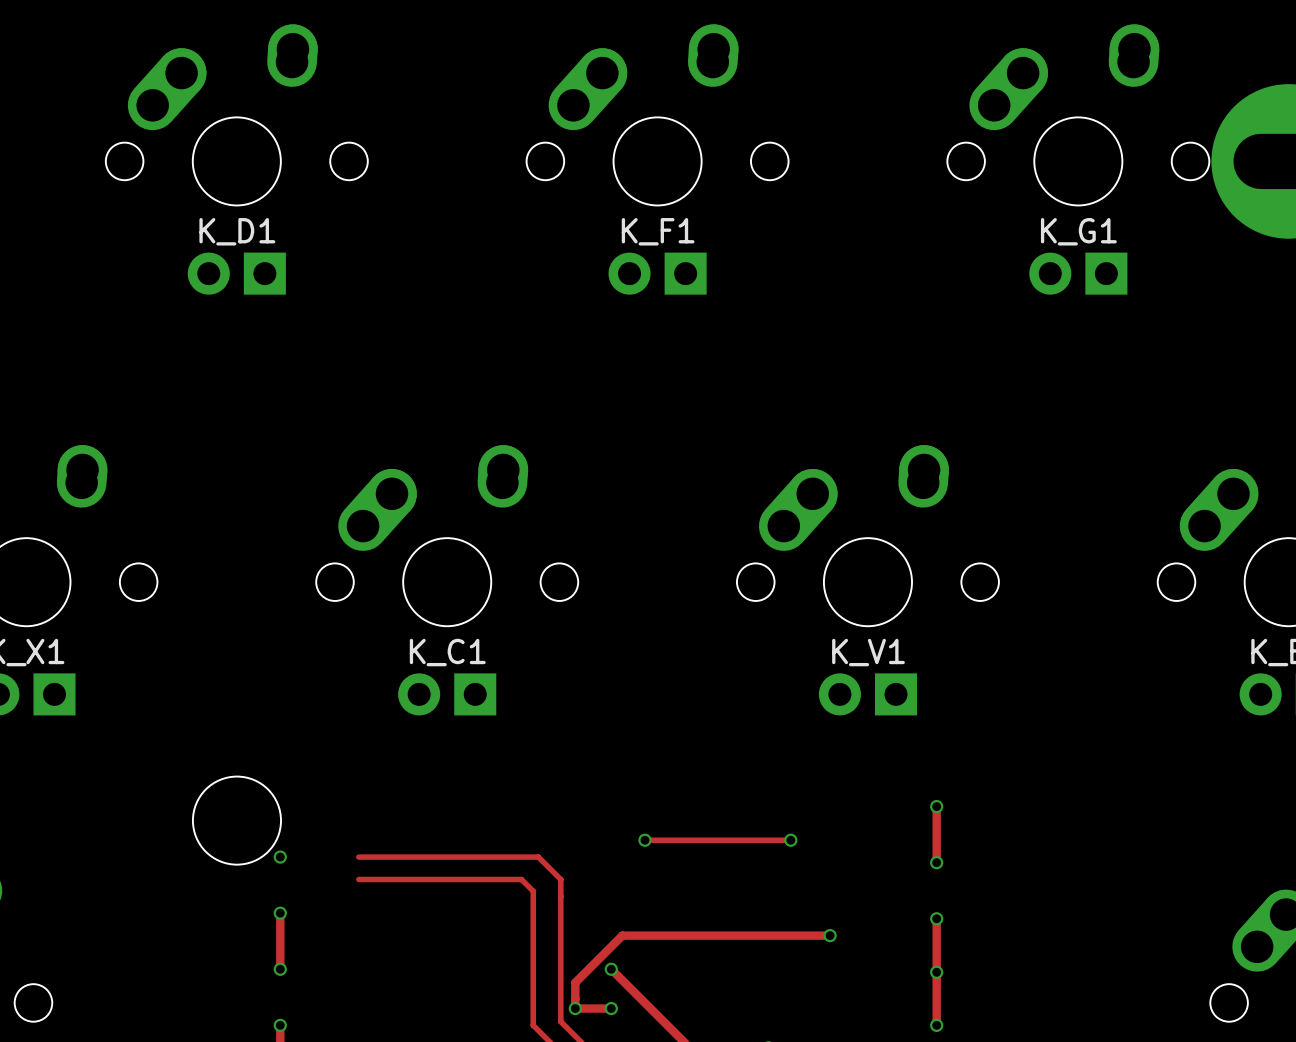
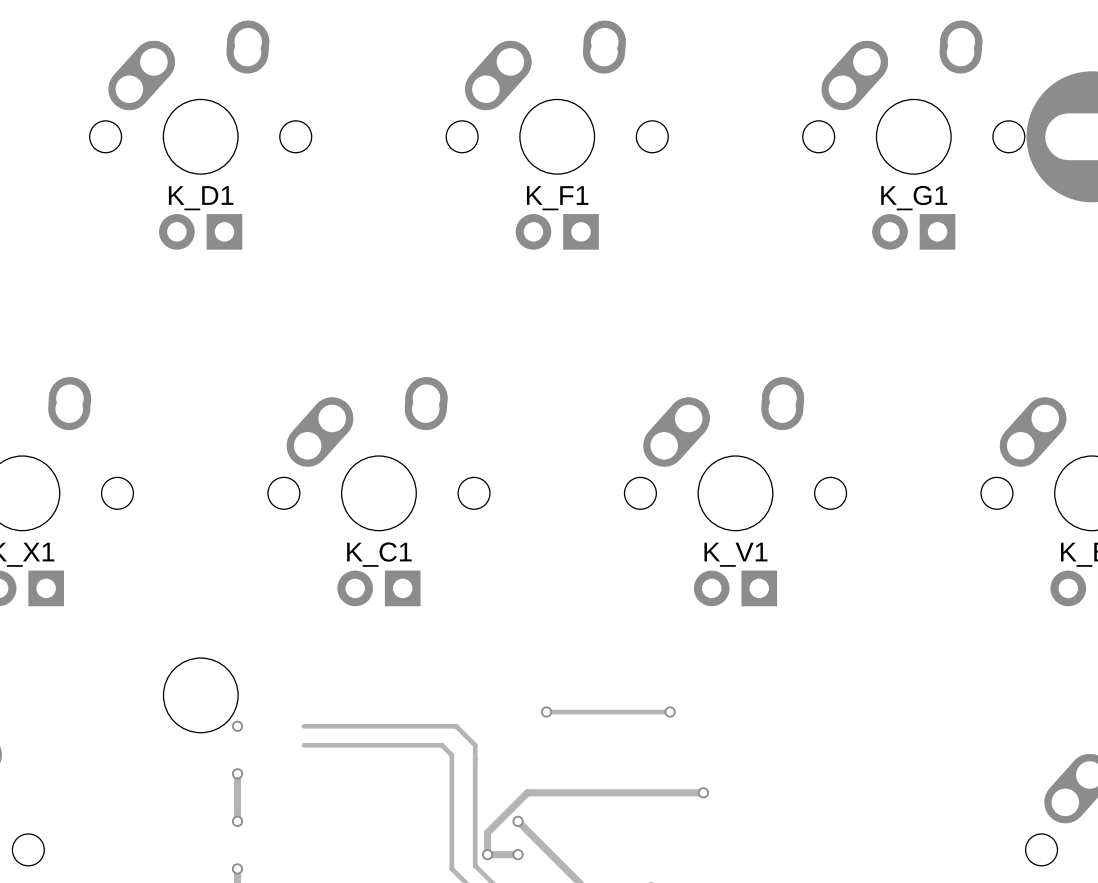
track: (936, 806) (936, 862) -> none
via: (936, 806) -> none
via: (936, 862) -> none
track: (936, 918) (936, 1025) -> none
via: (936, 918) -> none
via: (936, 972) -> none
via: (936, 1025) -> none

